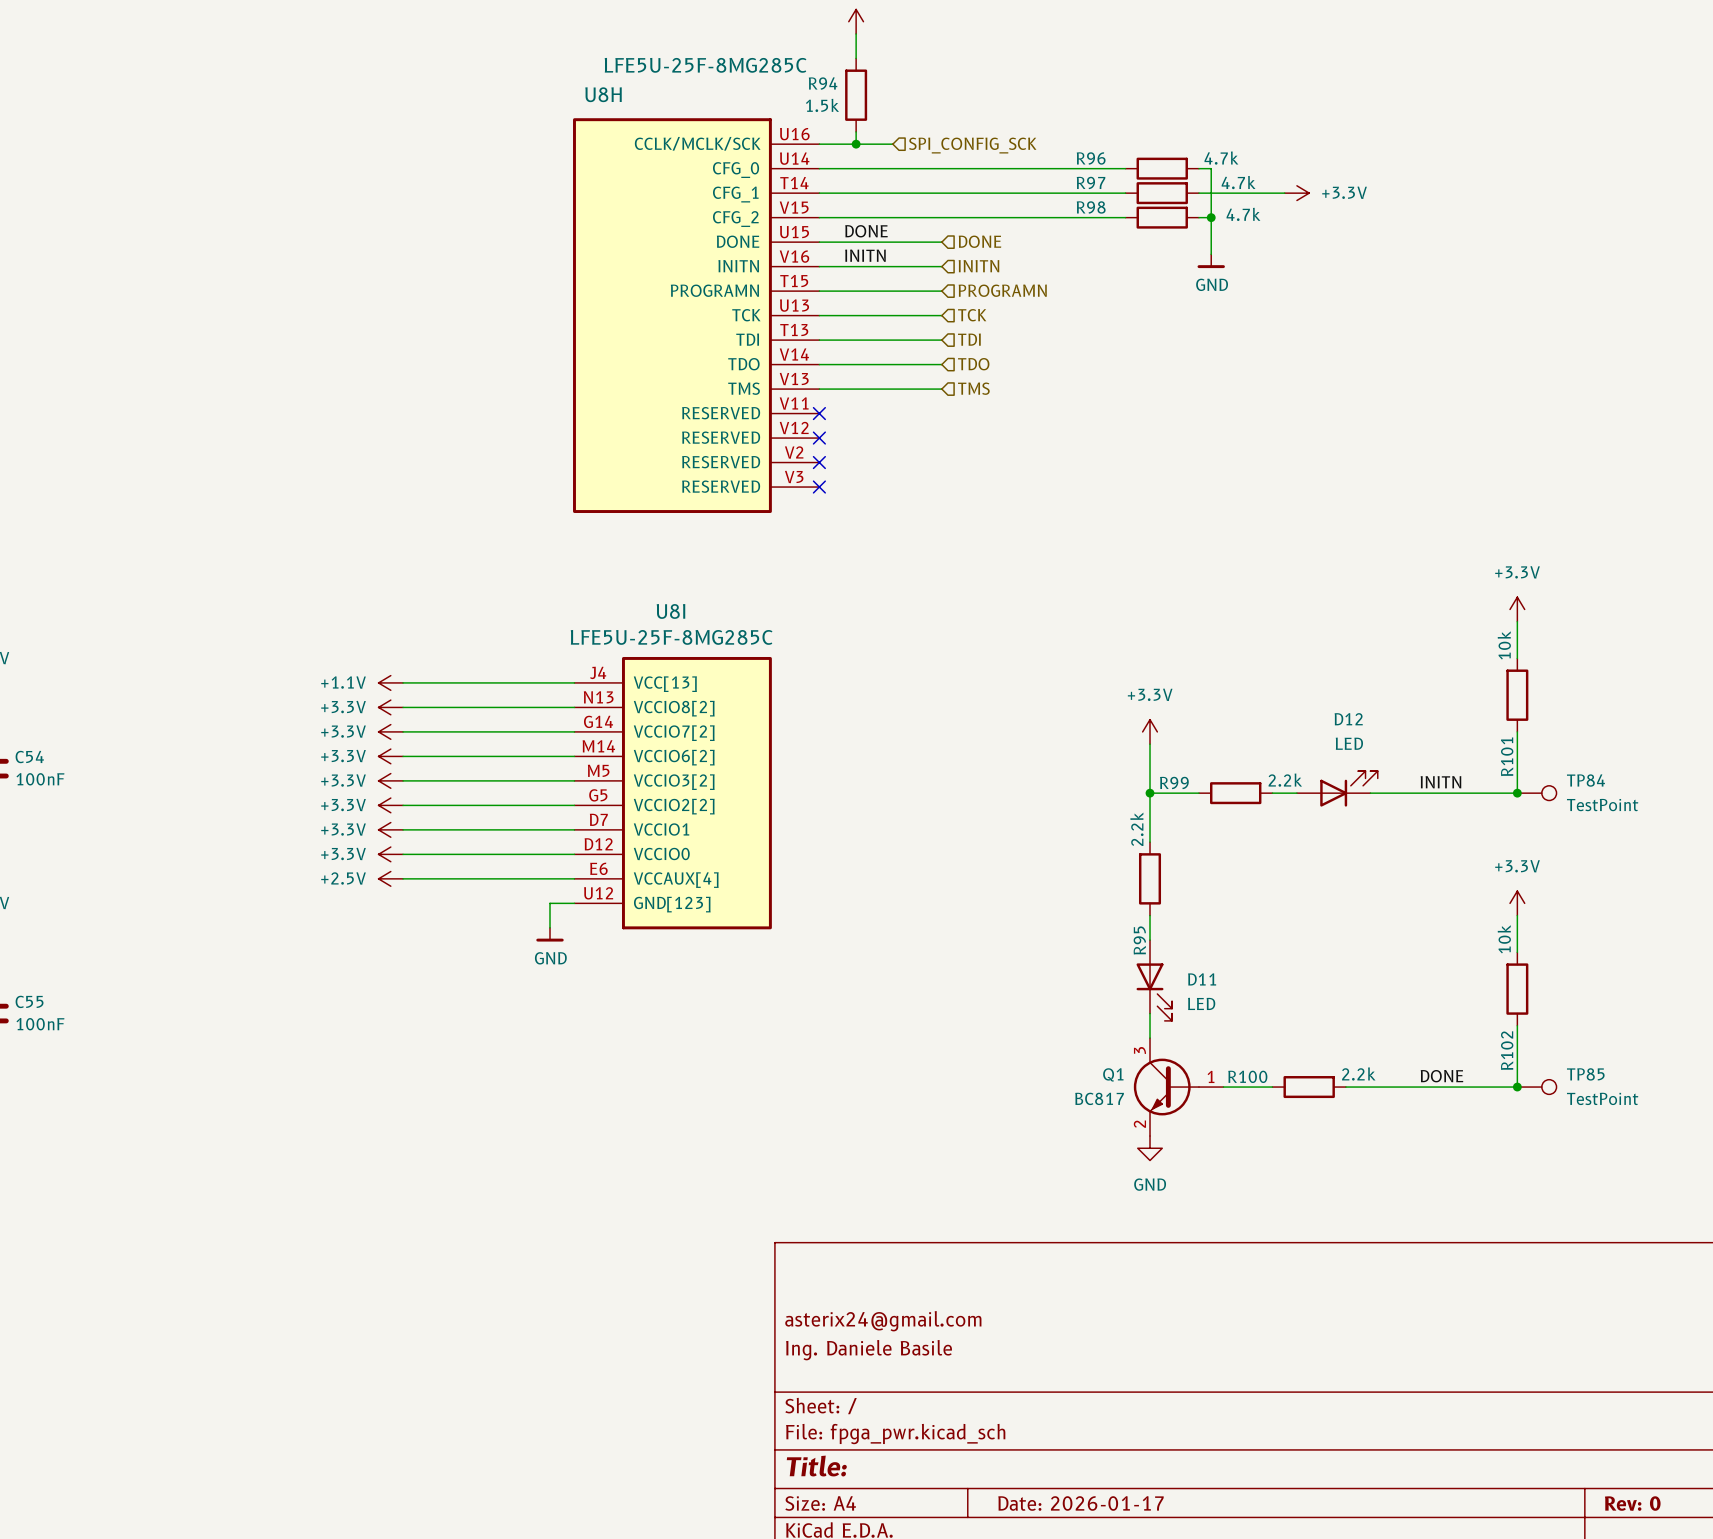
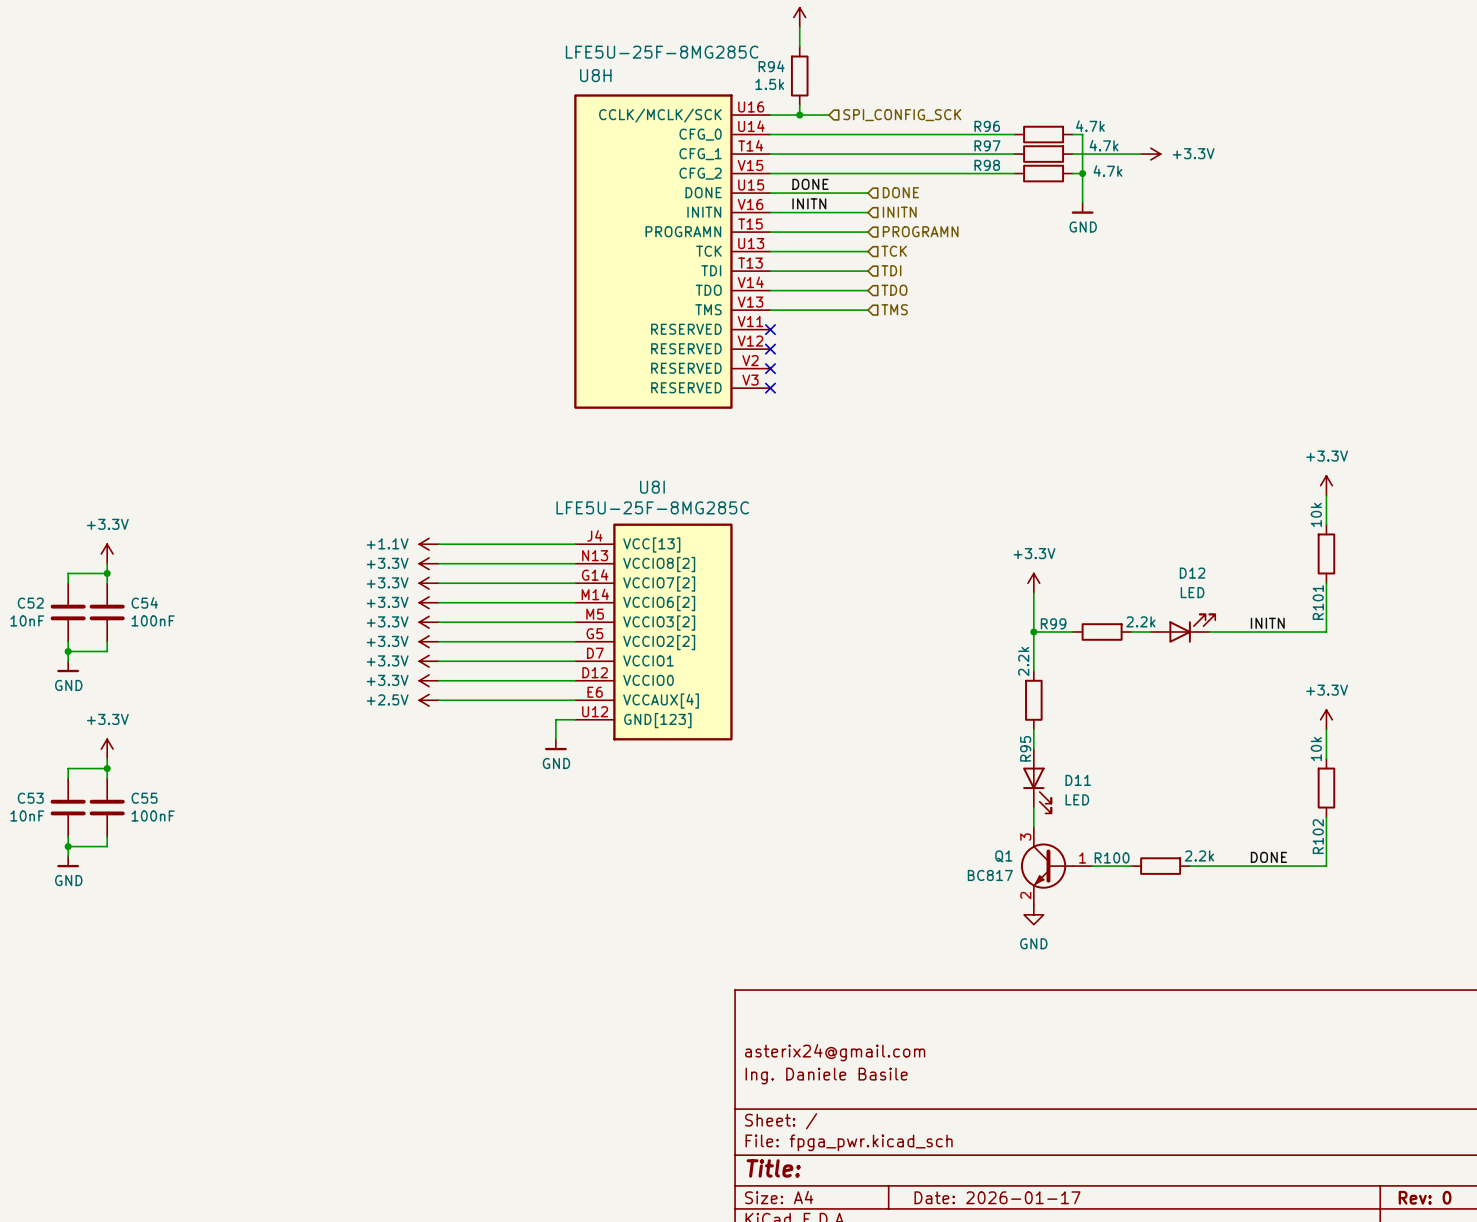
junction: (1517, 793) -> none
TP84: TestPoint (1536, 793) -> none
junction: (1517, 1087) -> none
TP85: TestPoint (1536, 1087) -> none

